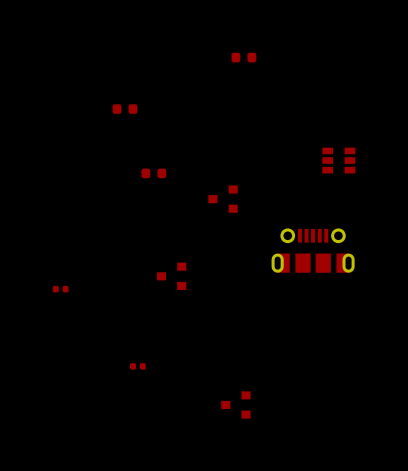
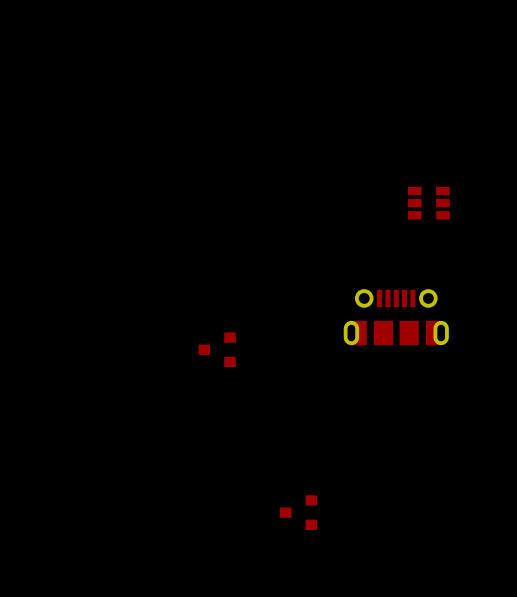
part: (243, 57) -> none
part: (125, 109) -> none
part: (153, 173) -> none
part: (223, 199) -> none
part: (60, 289) -> none
part: (137, 366) -> none

